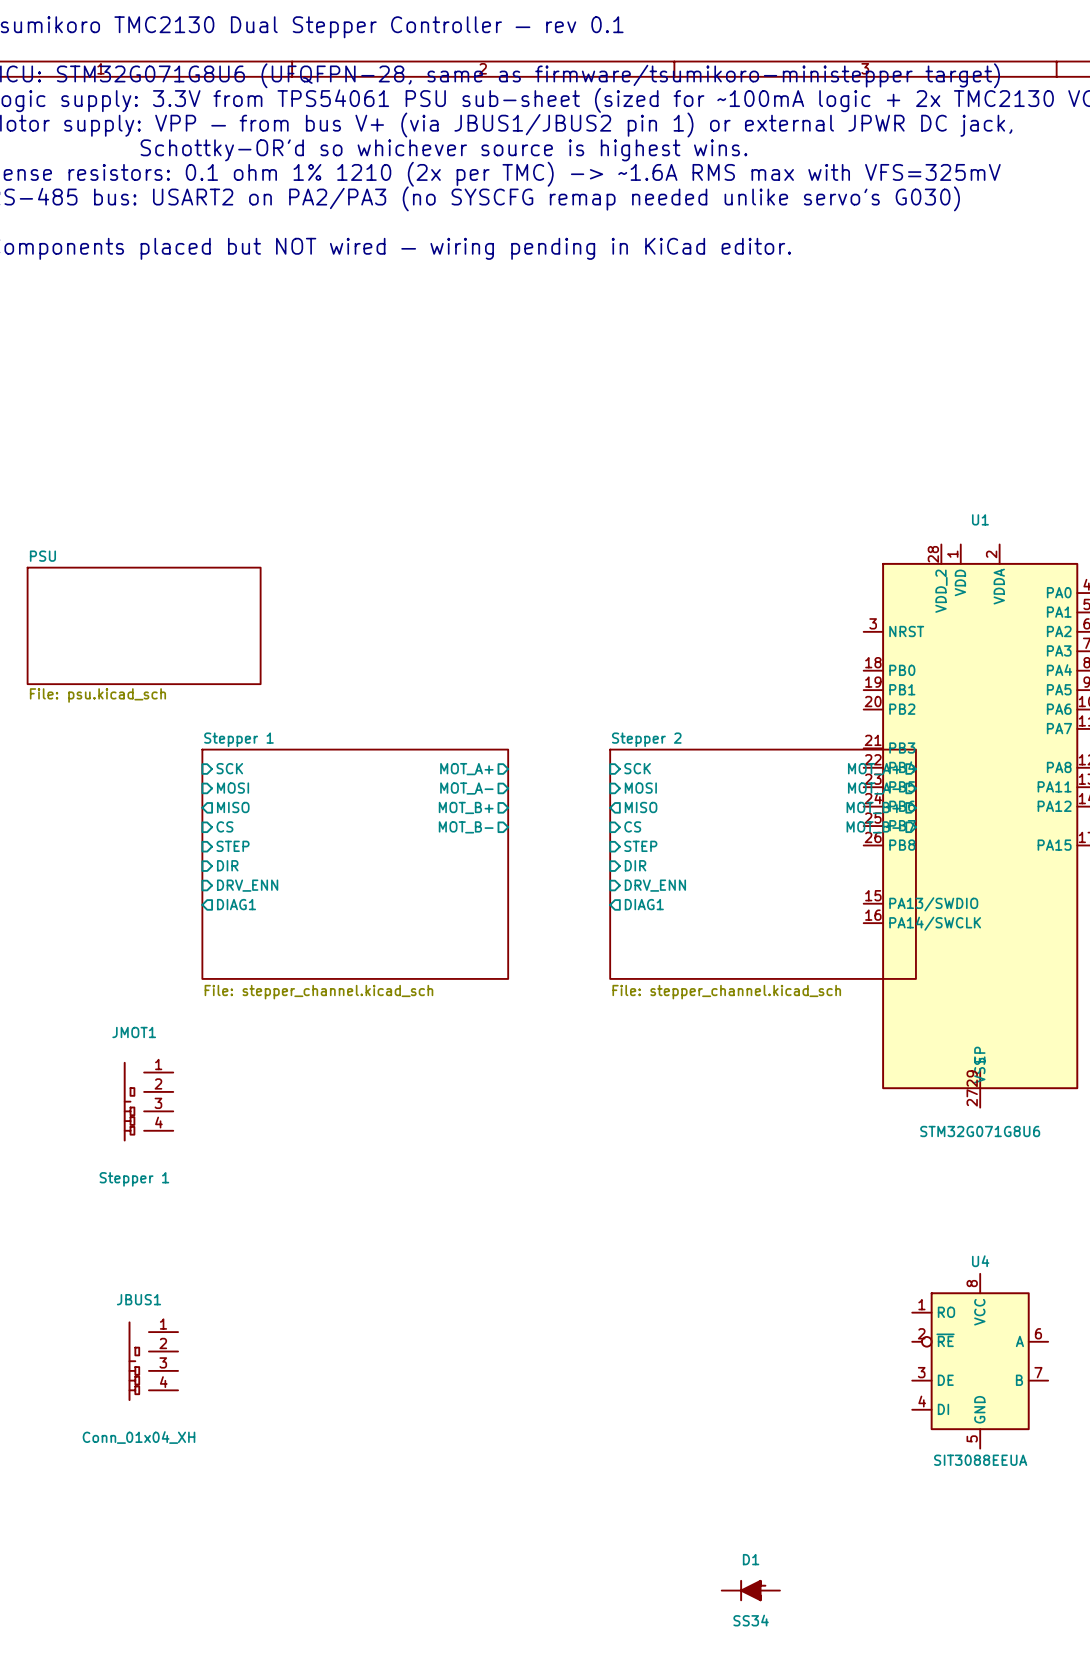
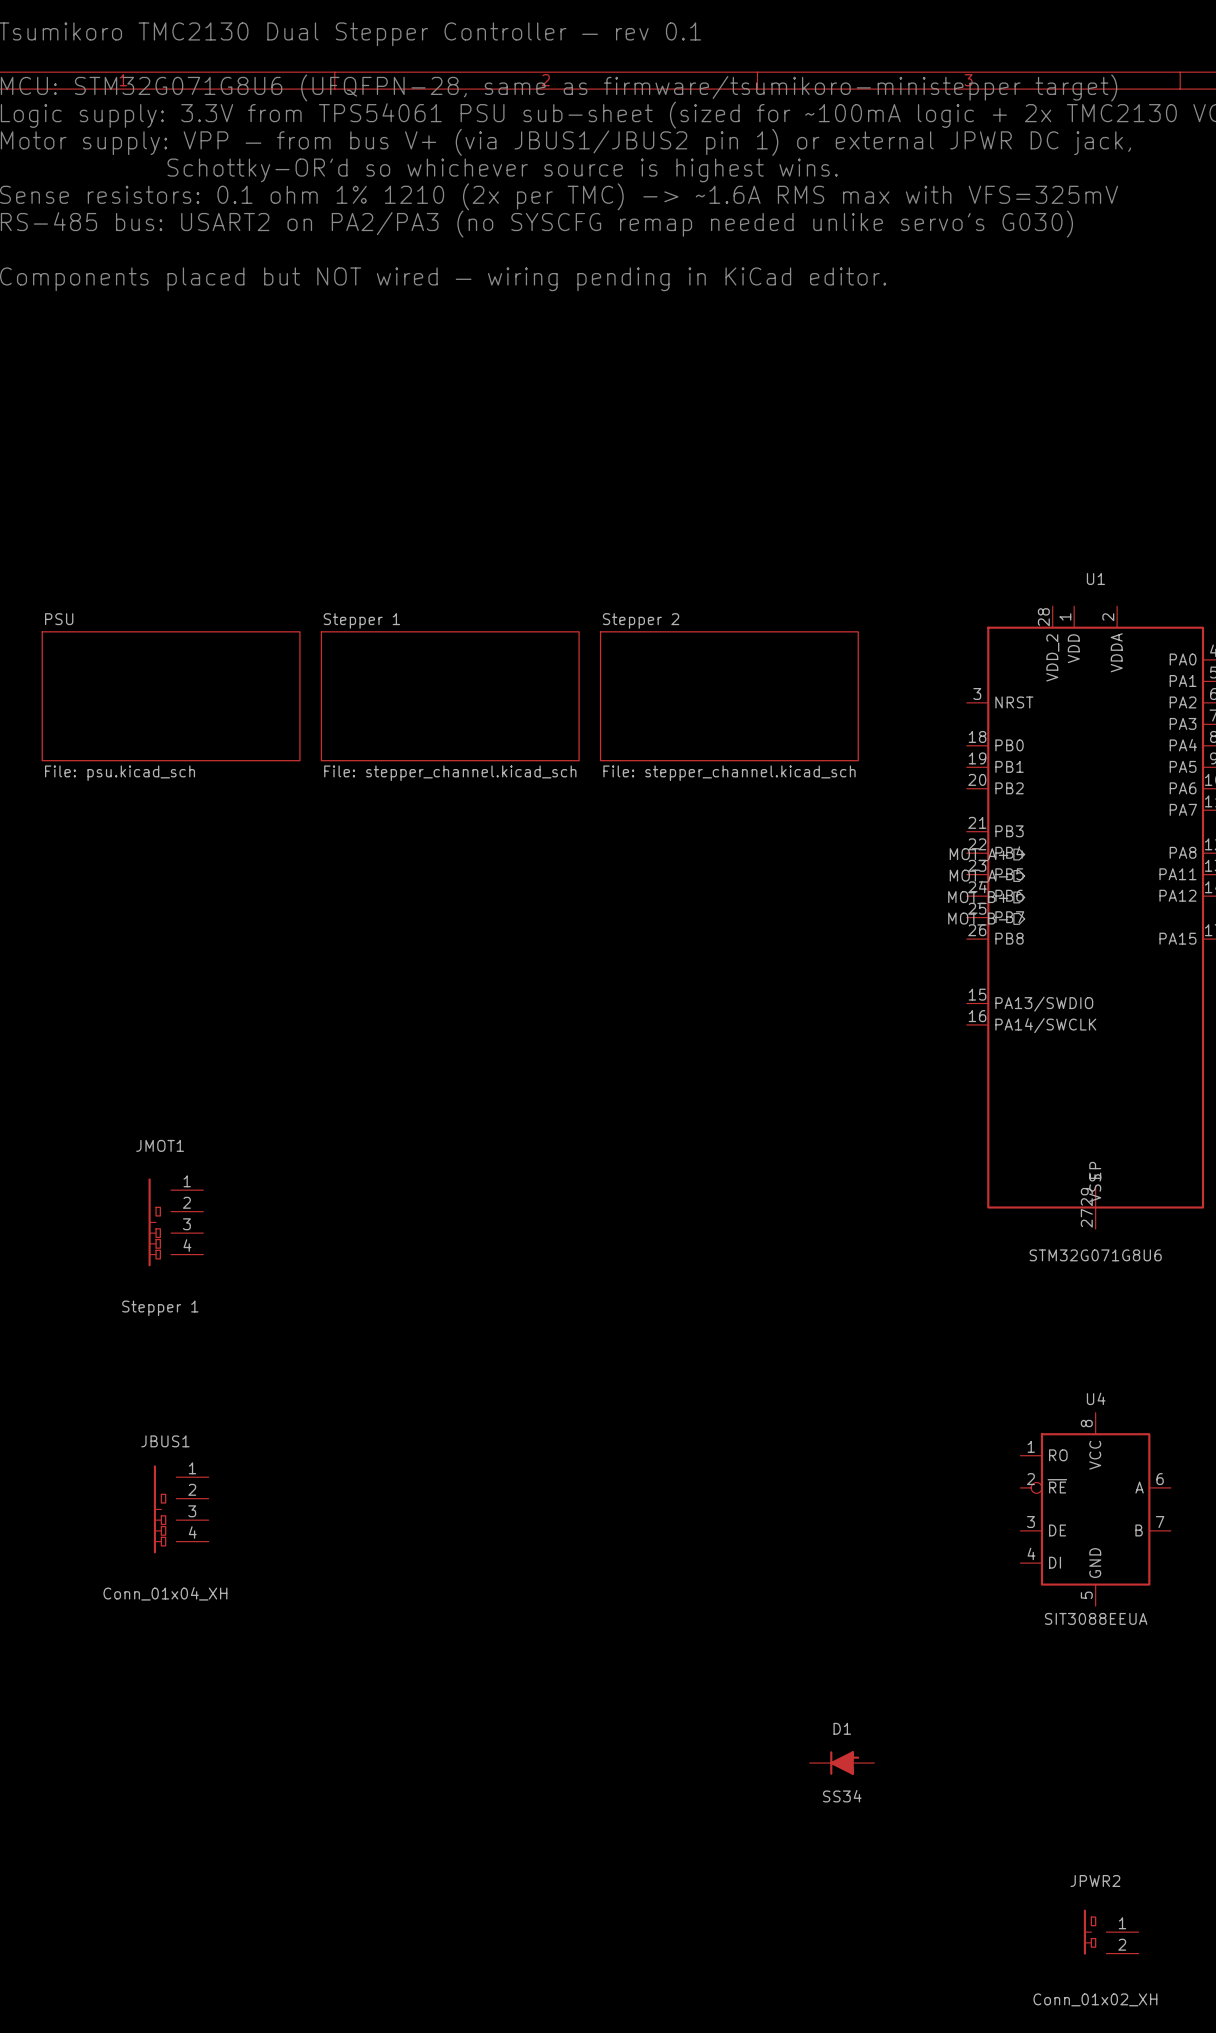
sheet Stepper 1 name position: Stepper 1 (238, 739) -> Stepper 1 (361, 620)
sheet Stepper 2 name position: Stepper 2 (646, 739) -> Stepper 2 (641, 620)
sheet Stepper 1 shape: [201, 749, 509, 980] -> [320, 631, 580, 762]
sheet Stepper 2 shape: [609, 749, 917, 980] -> [599, 631, 859, 762]
sheet pin: SCK (229, 768) -> none
sheet pin: SCK (637, 768) -> none
sheet pin: MOT_A+ (466, 769) -> none
sheet pin: MOSI (233, 788) -> none
sheet pin: MOT_A- (466, 788) -> none
sheet pin: MOSI (640, 788) -> none
sheet pin: MISO (233, 807) -> none
sheet pin: MOT_B+ (466, 807) -> none
sheet pin: MISO (641, 807) -> none
sheet pin: CS (224, 826) -> none
sheet pin: CS (632, 826) -> none
sheet pin: MOT_B- (466, 827) -> none
sheet pin: STEP (233, 846) -> none
sheet pin: STEP (640, 846) -> none
sheet pin: DIR (227, 865) -> none
sheet pin: DIR (635, 865) -> none
sheet pin: DRV_ENN (247, 885) -> none
sheet pin: DRV_ENN (655, 885) -> none
sheet pin: DIAG1 (236, 904) -> none
sheet pin: DIAG1 (644, 904) -> none
sheet Stepper 1 value position: File: stepper_channel.kicad_sch (318, 992) -> File: stepper_channel.kicad_sch (450, 773)
sheet Stepper 2 value position: File: stepper_channel.kicad_sch (726, 992) -> File: stepper_channel.kicad_sch (729, 773)

